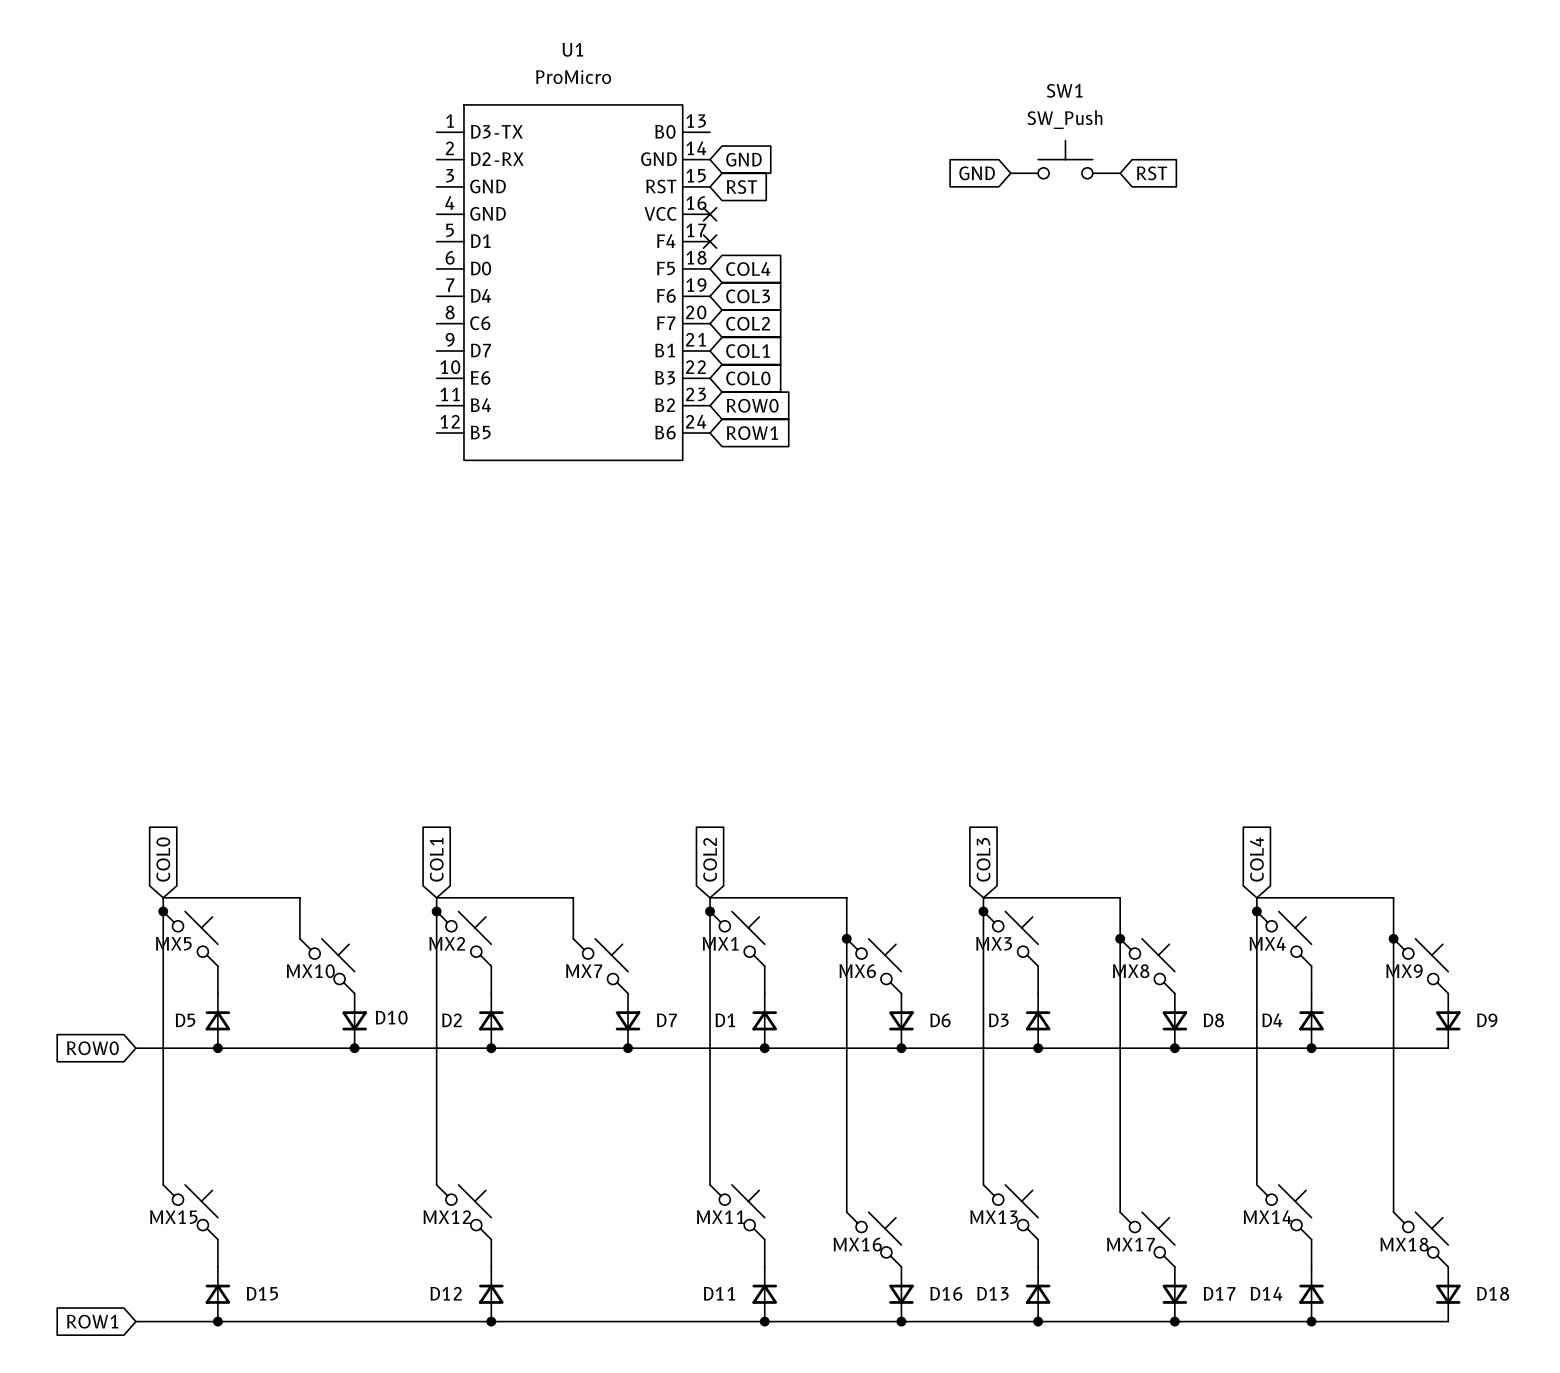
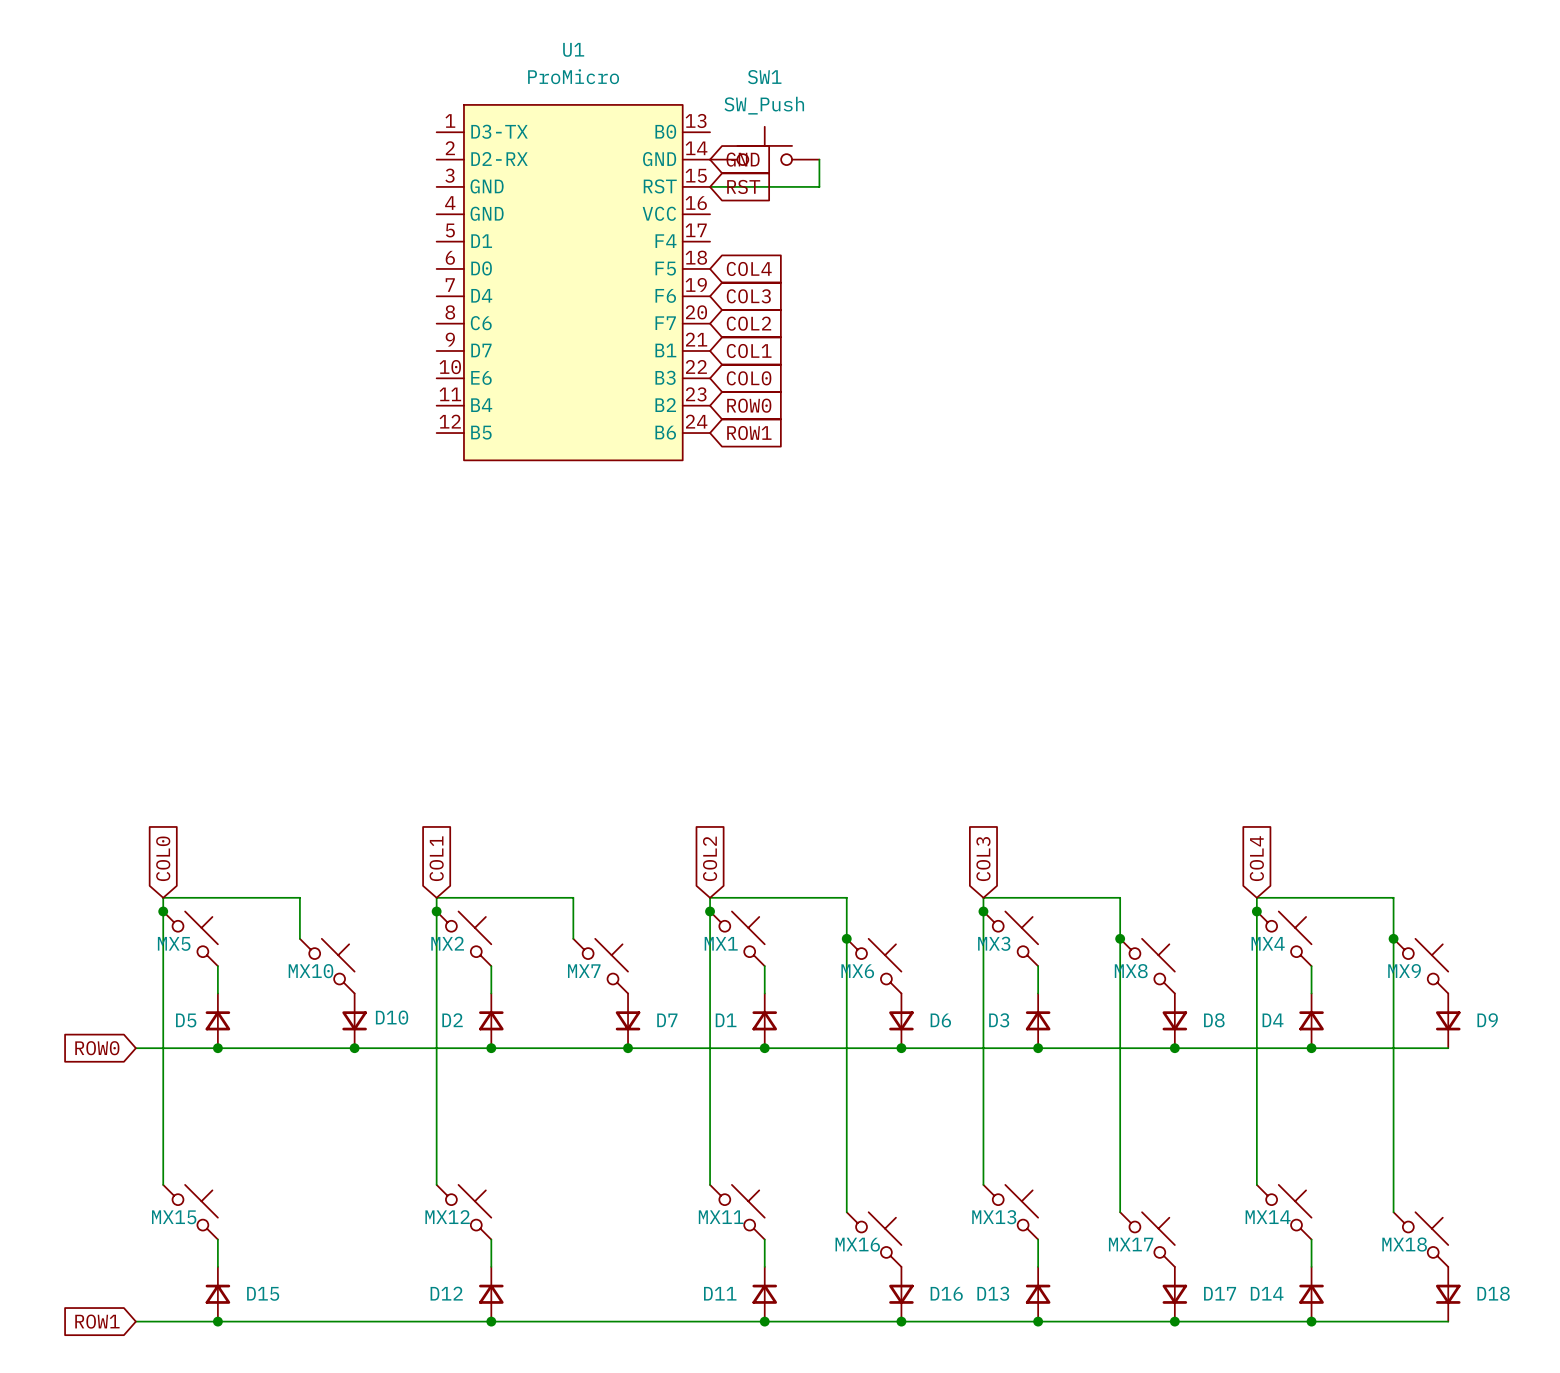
wire: none -> (819, 159) (819, 186) (710, 186)
SW1 position: (1065, 159) -> (764, 145)
global label: GND (977, 173) -> none
global label: RST (1152, 173) -> none
no-connect mark: (710, 214) -> none
no-connect mark: (710, 241) -> none

